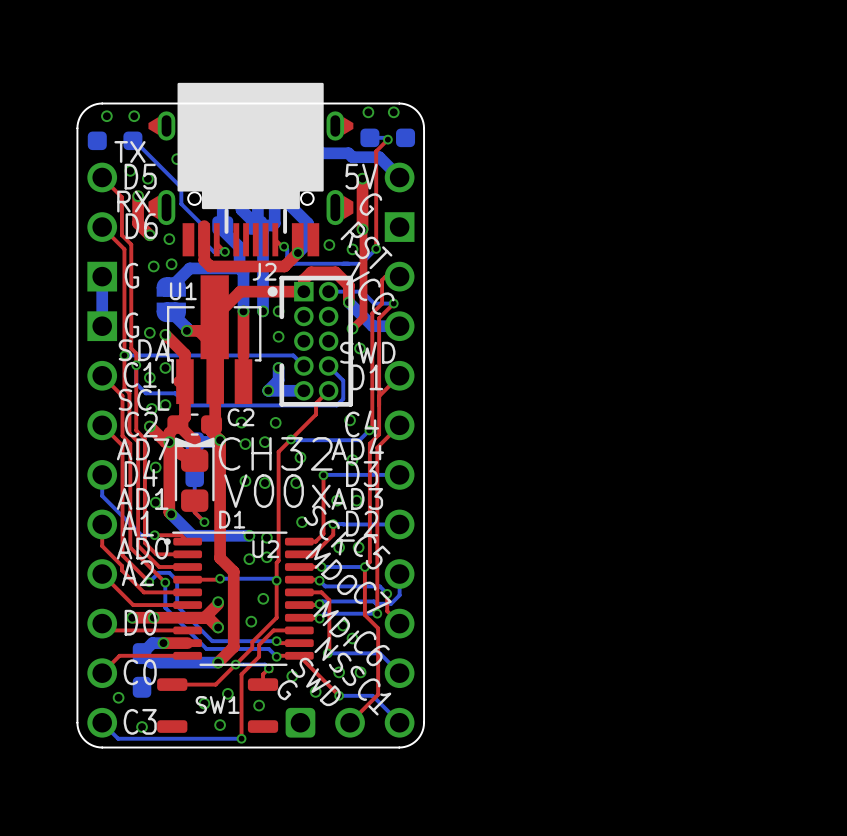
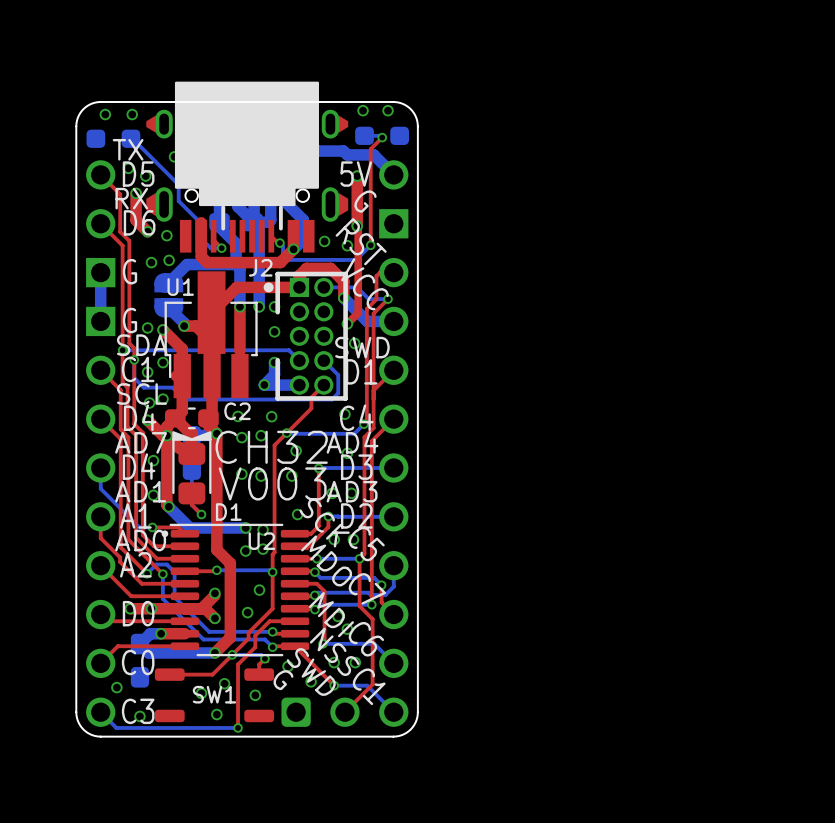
text: C2 (141, 424) -> D4 (140, 417)
text: V00x (277, 491) -> V003 (272, 483)

